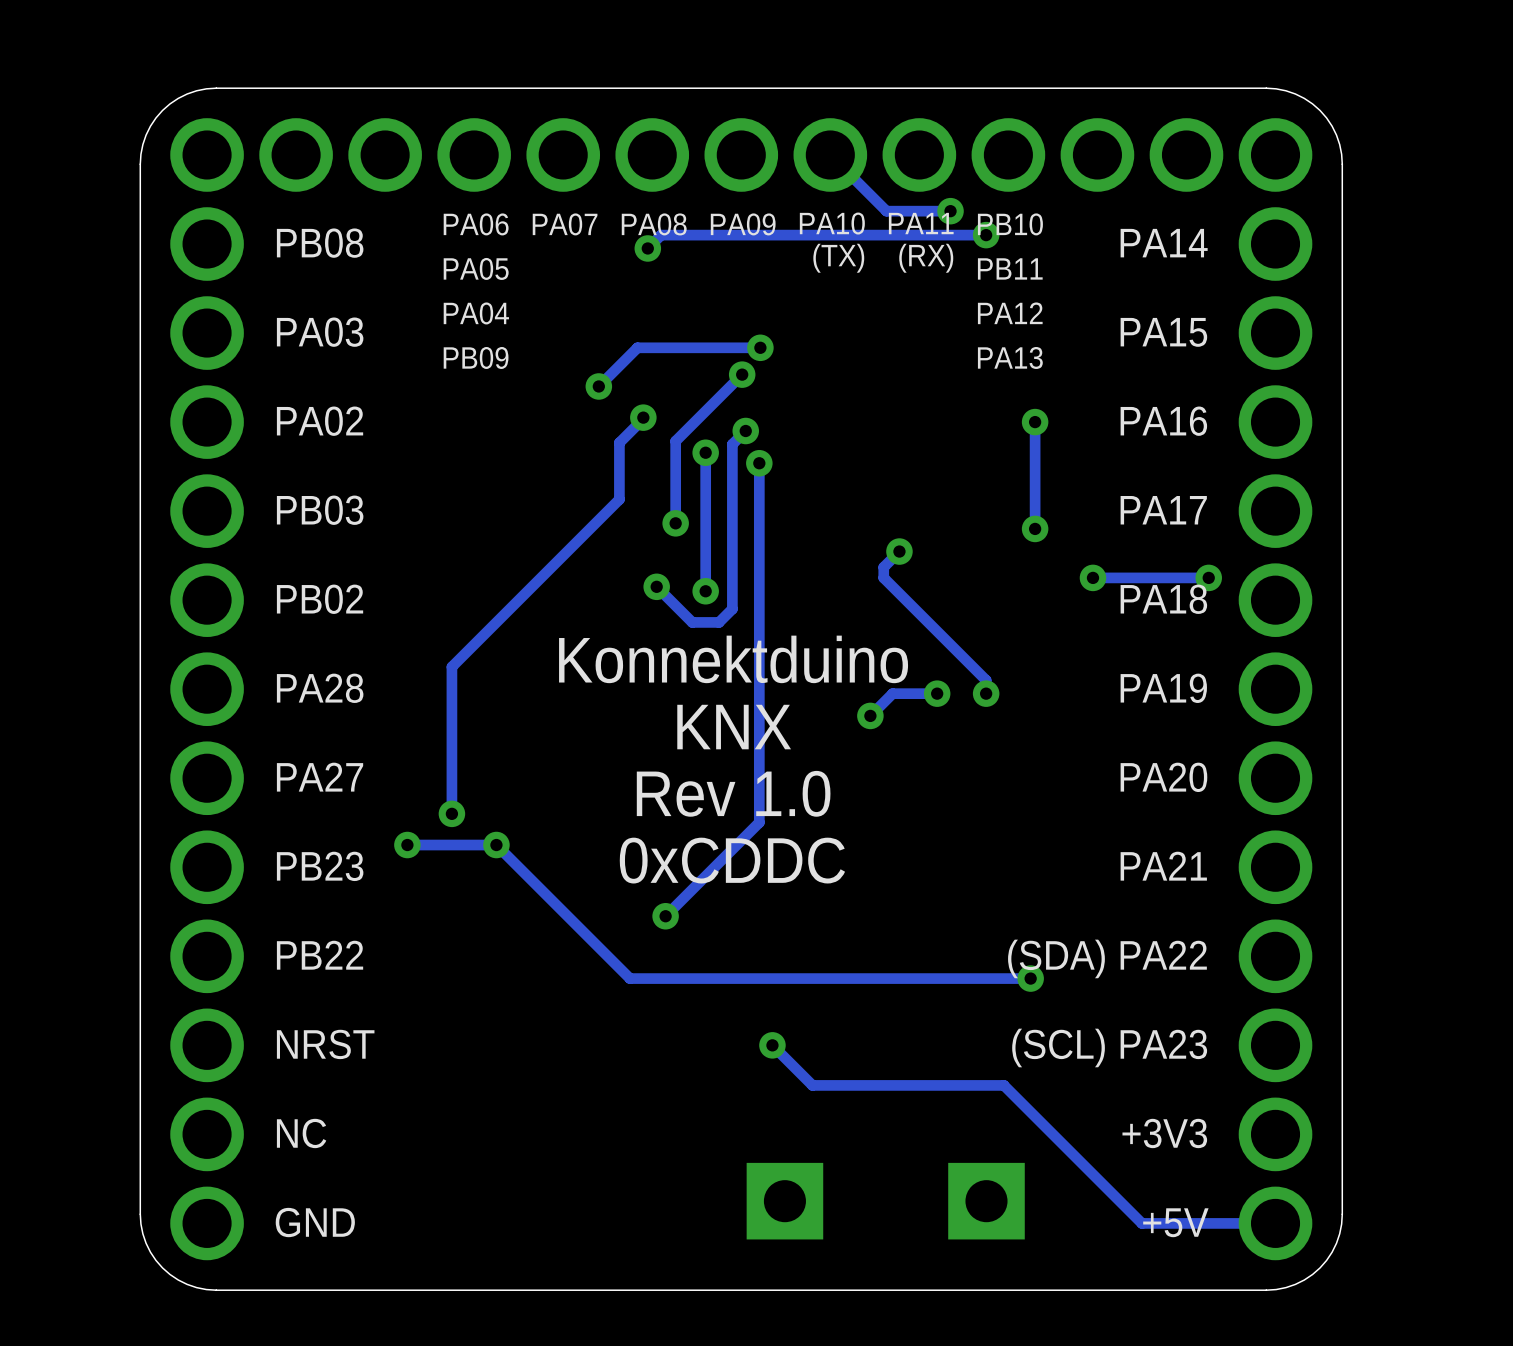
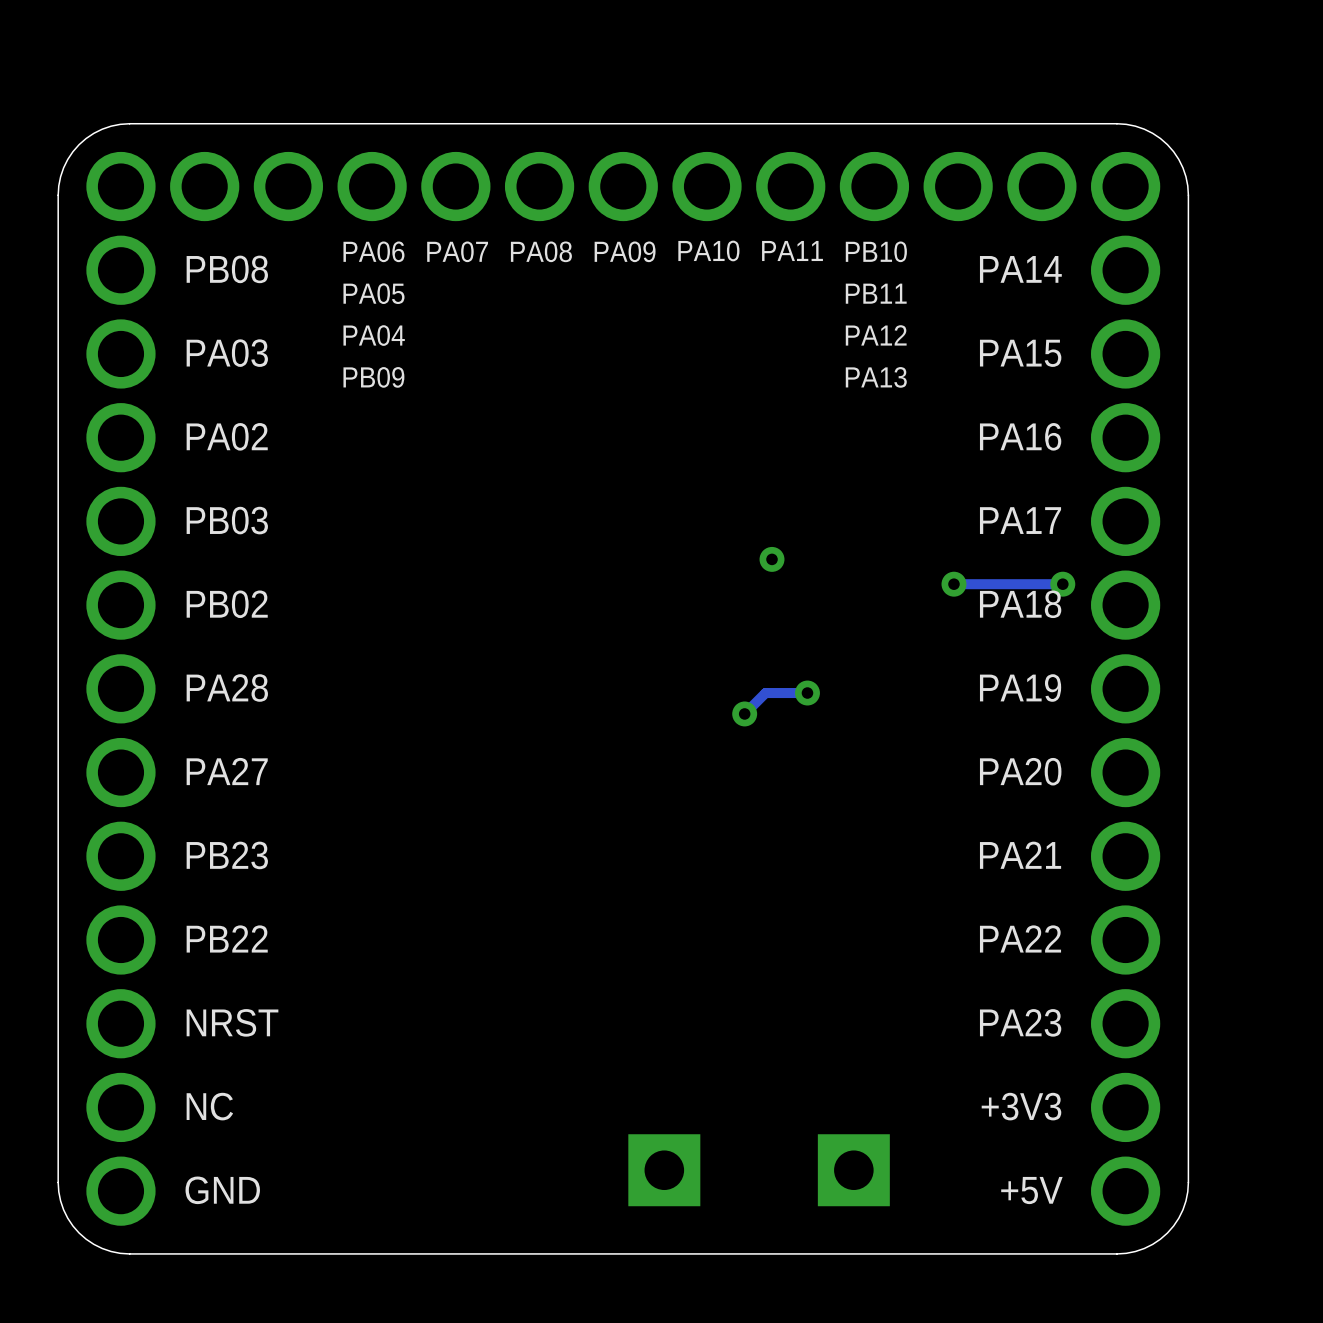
track: (830, 154) (886, 211) (950, 211) -> none
via: (950, 211) -> none
track: (986, 235) (661, 235) (647, 248) -> none
via: (986, 235) -> none
via: (647, 248) -> none
text: (TX) (838, 258) -> none
text: (RX) (926, 258) -> none
track: (760, 347) (637, 347) (598, 386) -> none
via: (760, 347) -> none
track: (742, 374) (675, 441) (675, 523) -> none
via: (742, 374) -> none
via: (598, 386) -> none
track: (643, 417) (619, 442) (619, 499) (451, 666) (451, 813) -> none
via: (643, 417) -> none
track: (1035, 422) (1035, 528) -> none
via: (1035, 422) -> none
track: (745, 430) (732, 444) (732, 609) (719, 622) (692, 622) (656, 586) -> none
via: (745, 430) -> none
track: (705, 452) (705, 591) -> none
via: (705, 452) -> none
track: (759, 463) (759, 822) (665, 916) -> none
via: (759, 463) -> none
via: (675, 523) -> none
via: (1035, 528) -> none
track: (899, 551) (883, 567) (883, 577) (986, 680) (986, 693) -> none
via: (656, 586) -> none
via: (705, 591) -> none
text: Konnektduino (733, 659) -> none
via: (986, 693) -> none
text: KNX (734, 727) -> none
text: Rev 1.0 (733, 793) -> none
via: (451, 813) -> none
track: (407, 845) (496, 845) (629, 978) (1030, 978) -> none
via: (407, 845) -> none
via: (496, 845) -> none
text: 0xCDDC (732, 860) -> none
via: (665, 916) -> none
text: (SDA) PA22 (1107, 958) -> PA22 (1020, 938)
via: (1030, 978) -> none
track: (772, 1045) (812, 1085) (1003, 1085) (1141, 1223) (1275, 1223) -> none
via: (772, 1045) -> none
text: (SCL) PA23 (1109, 1047) -> PA23 (1020, 1022)

